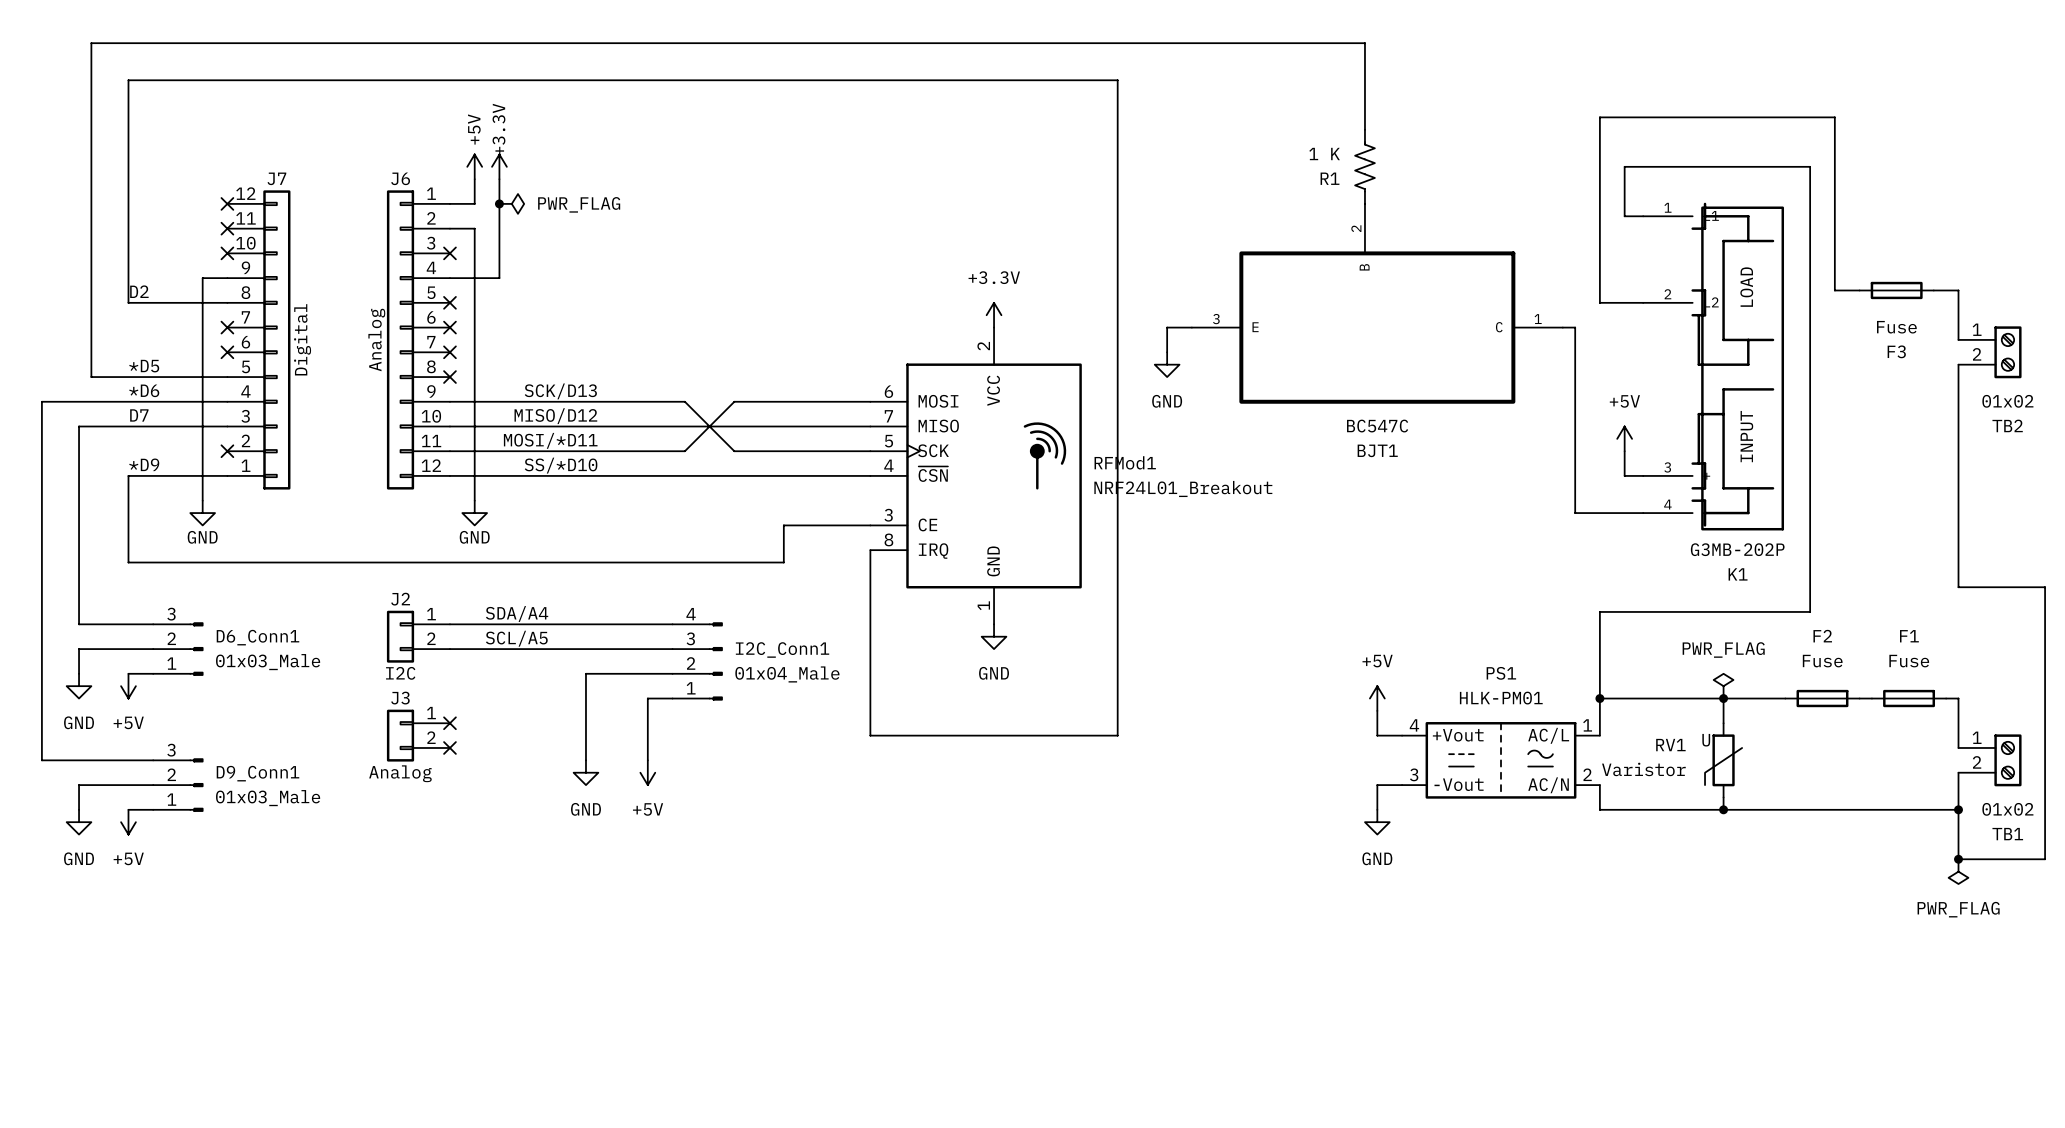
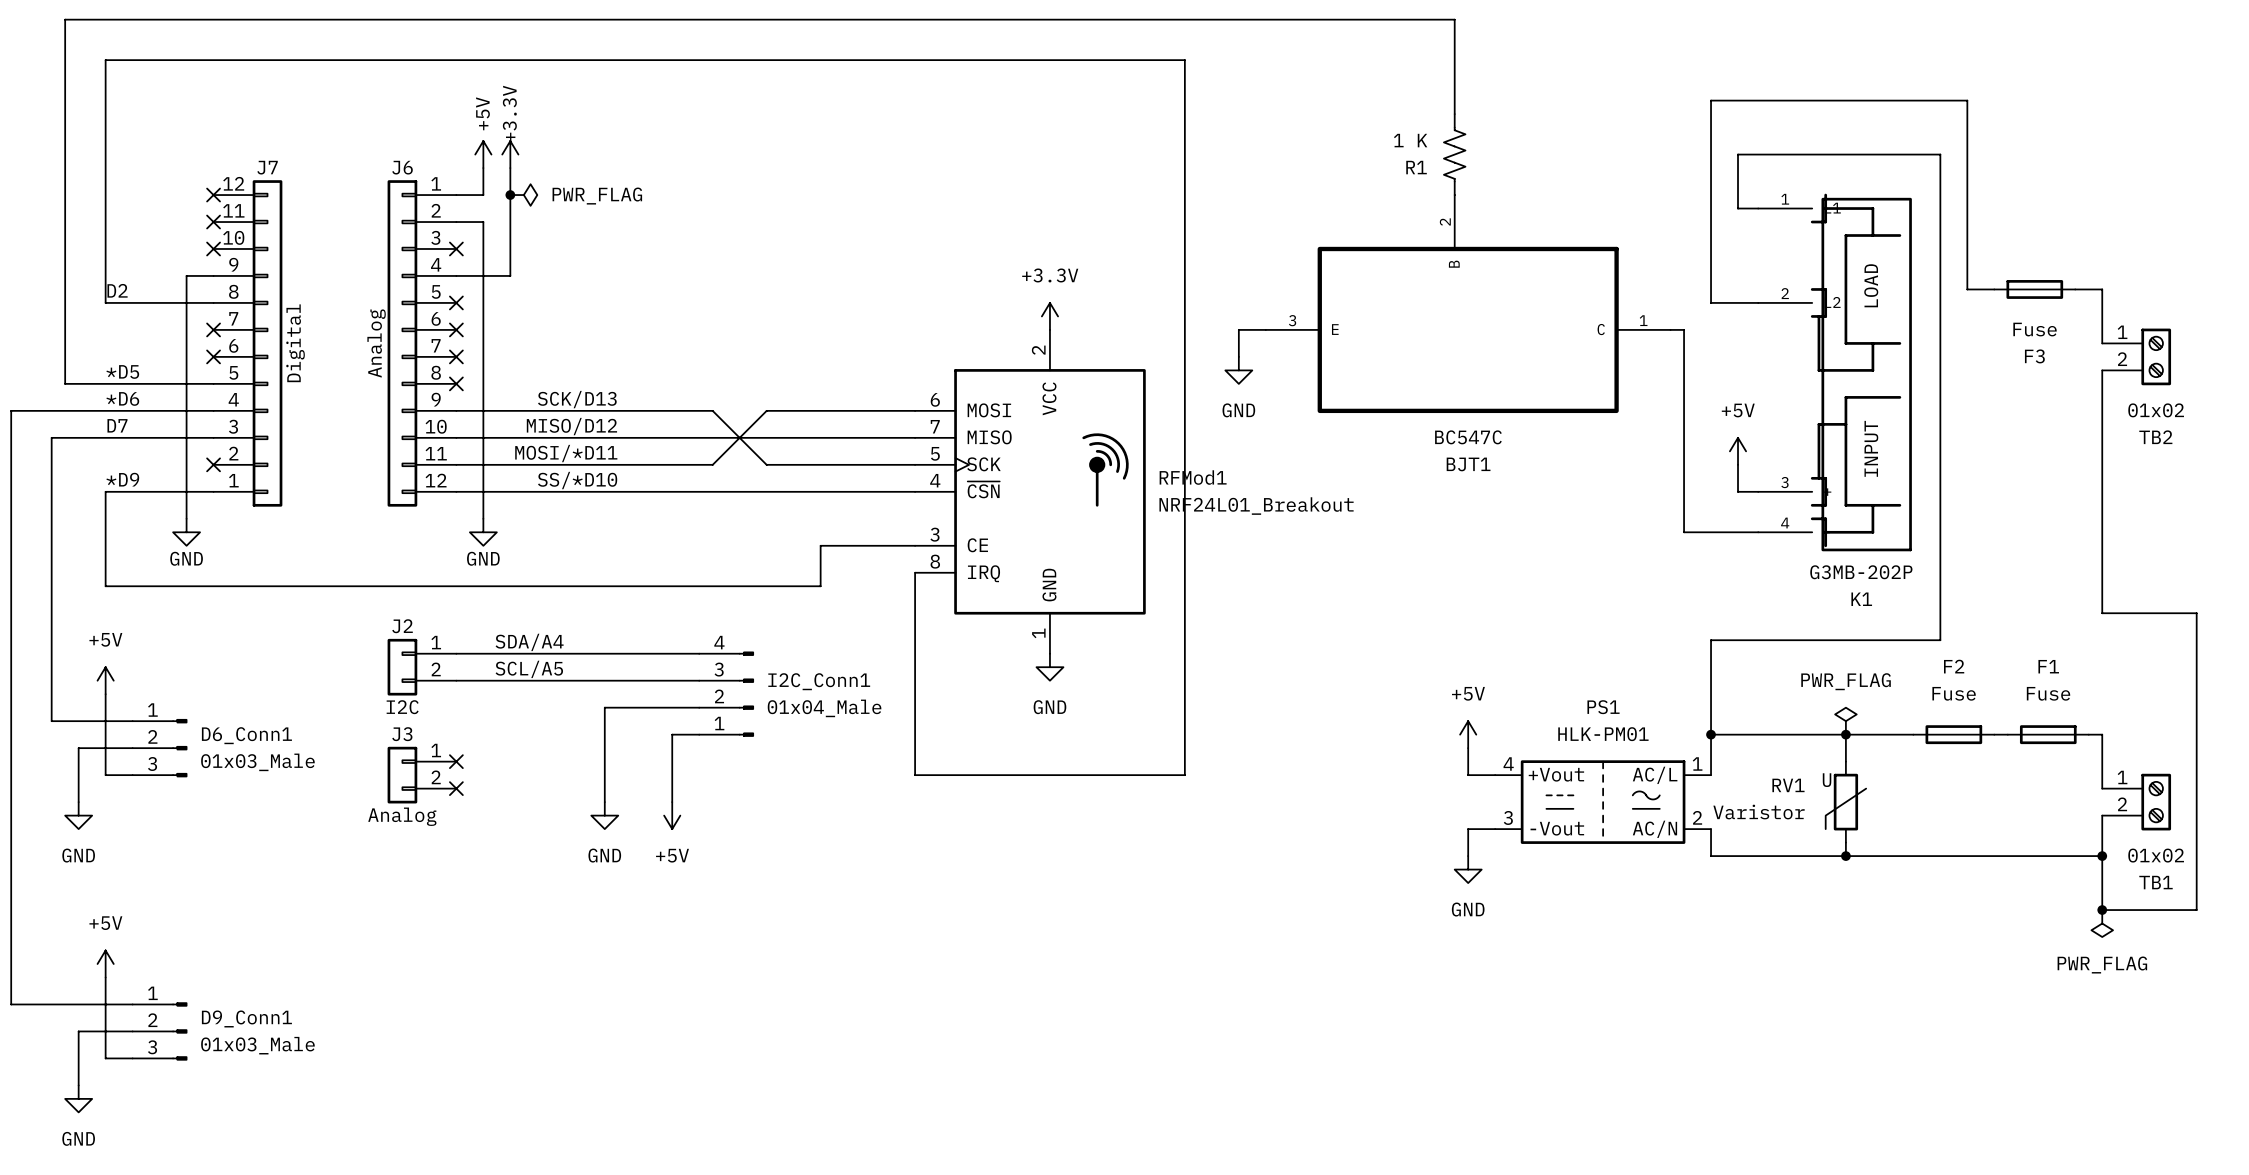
wire: (79, 624) (153, 624) -> (51, 653) (51, 680)
wire: (79, 649) (153, 649) -> none
D6_Conn1 position: (178, 649) -> (160, 748)
D6_Conn1 flip: as is (196, 649) -> up-down (179, 748)
wire: none -> (105, 694) (105, 775) (132, 775)
wire: none -> (51, 707) (51, 721) (132, 721)
wire: (128, 673) (153, 673) -> none
power symbol: GND (79, 686) -> none
power symbol rotation: 0° (128, 686) -> 180° (105, 680)
power symbol position: +5V (128, 686) -> +5V (105, 680)
wire: none -> (132, 748) (78, 748) (78, 802)
wire: (41, 760) (153, 760) -> (11, 802) (11, 1004) (132, 1004)
power symbol: none -> GND (78, 815)
wire: (153, 785) (79, 785) (79, 809) -> none
D9_Conn1 position: (178, 785) -> (160, 1031)
D9_Conn1 flip: as is (196, 785) -> up-down (179, 1031)
wire: (128, 809) (153, 809) -> none
power symbol: GND (79, 822) -> none
power symbol: +5V (128, 822) -> none
power symbol: none -> +5V (105, 964)
wire: none -> (105, 977) (105, 1058) (132, 1058)
wire: none -> (132, 1031) (78, 1031) (78, 1085)
power symbol: none -> GND (78, 1098)

